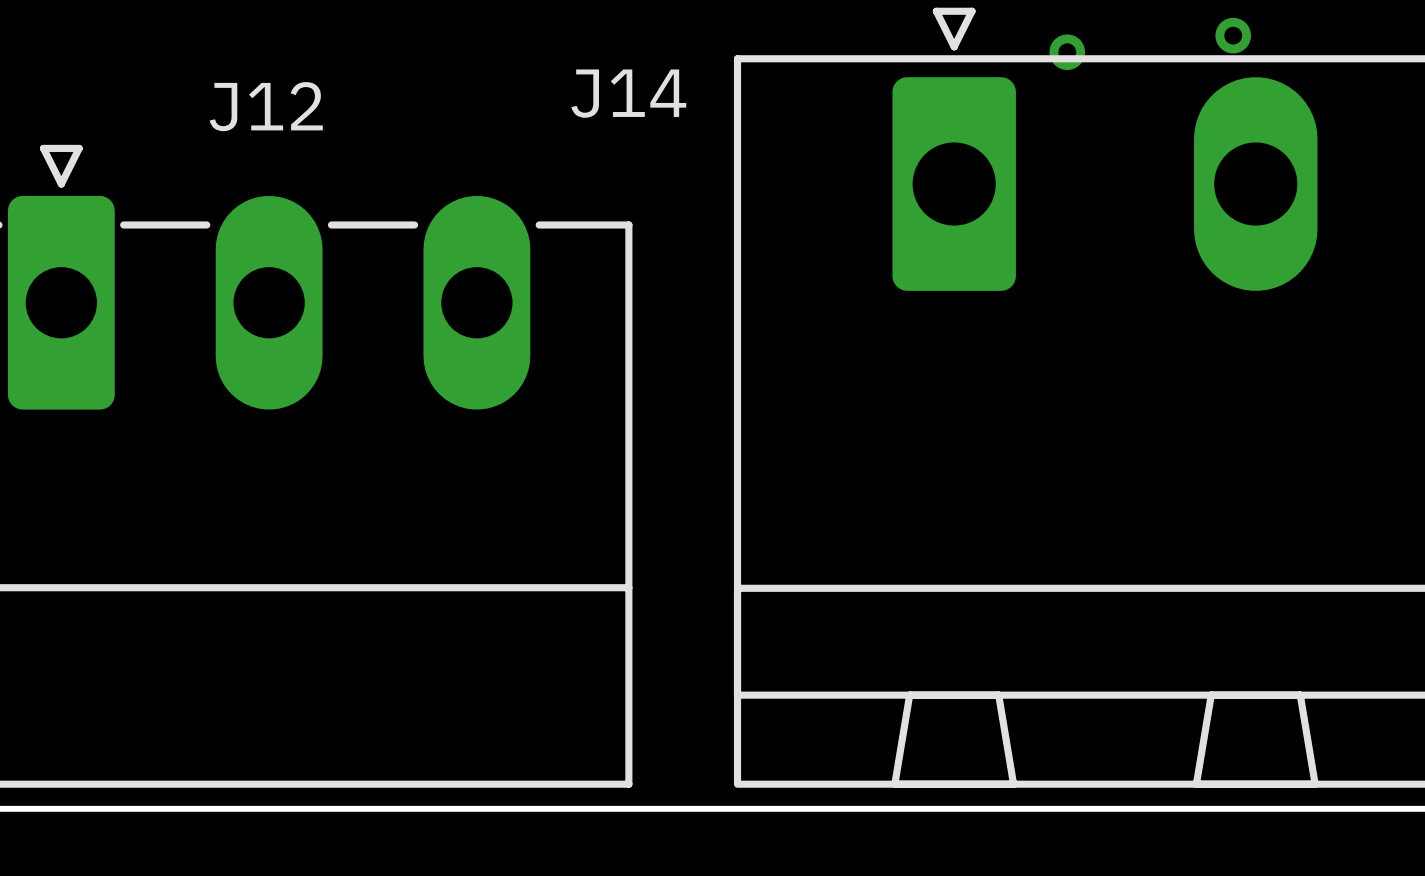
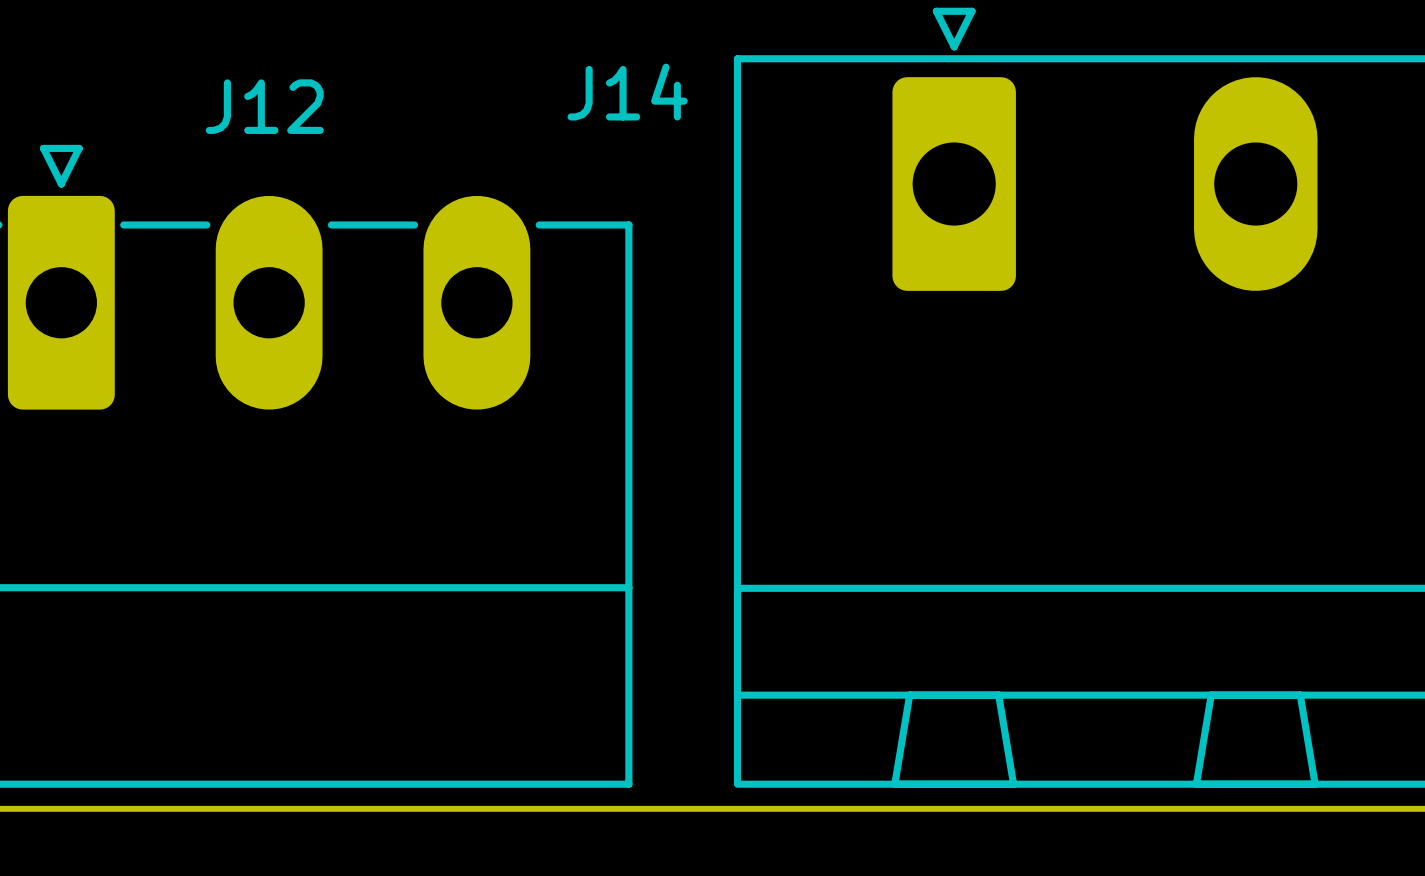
via: (1233, 35) -> none
via: (1067, 52) -> none

